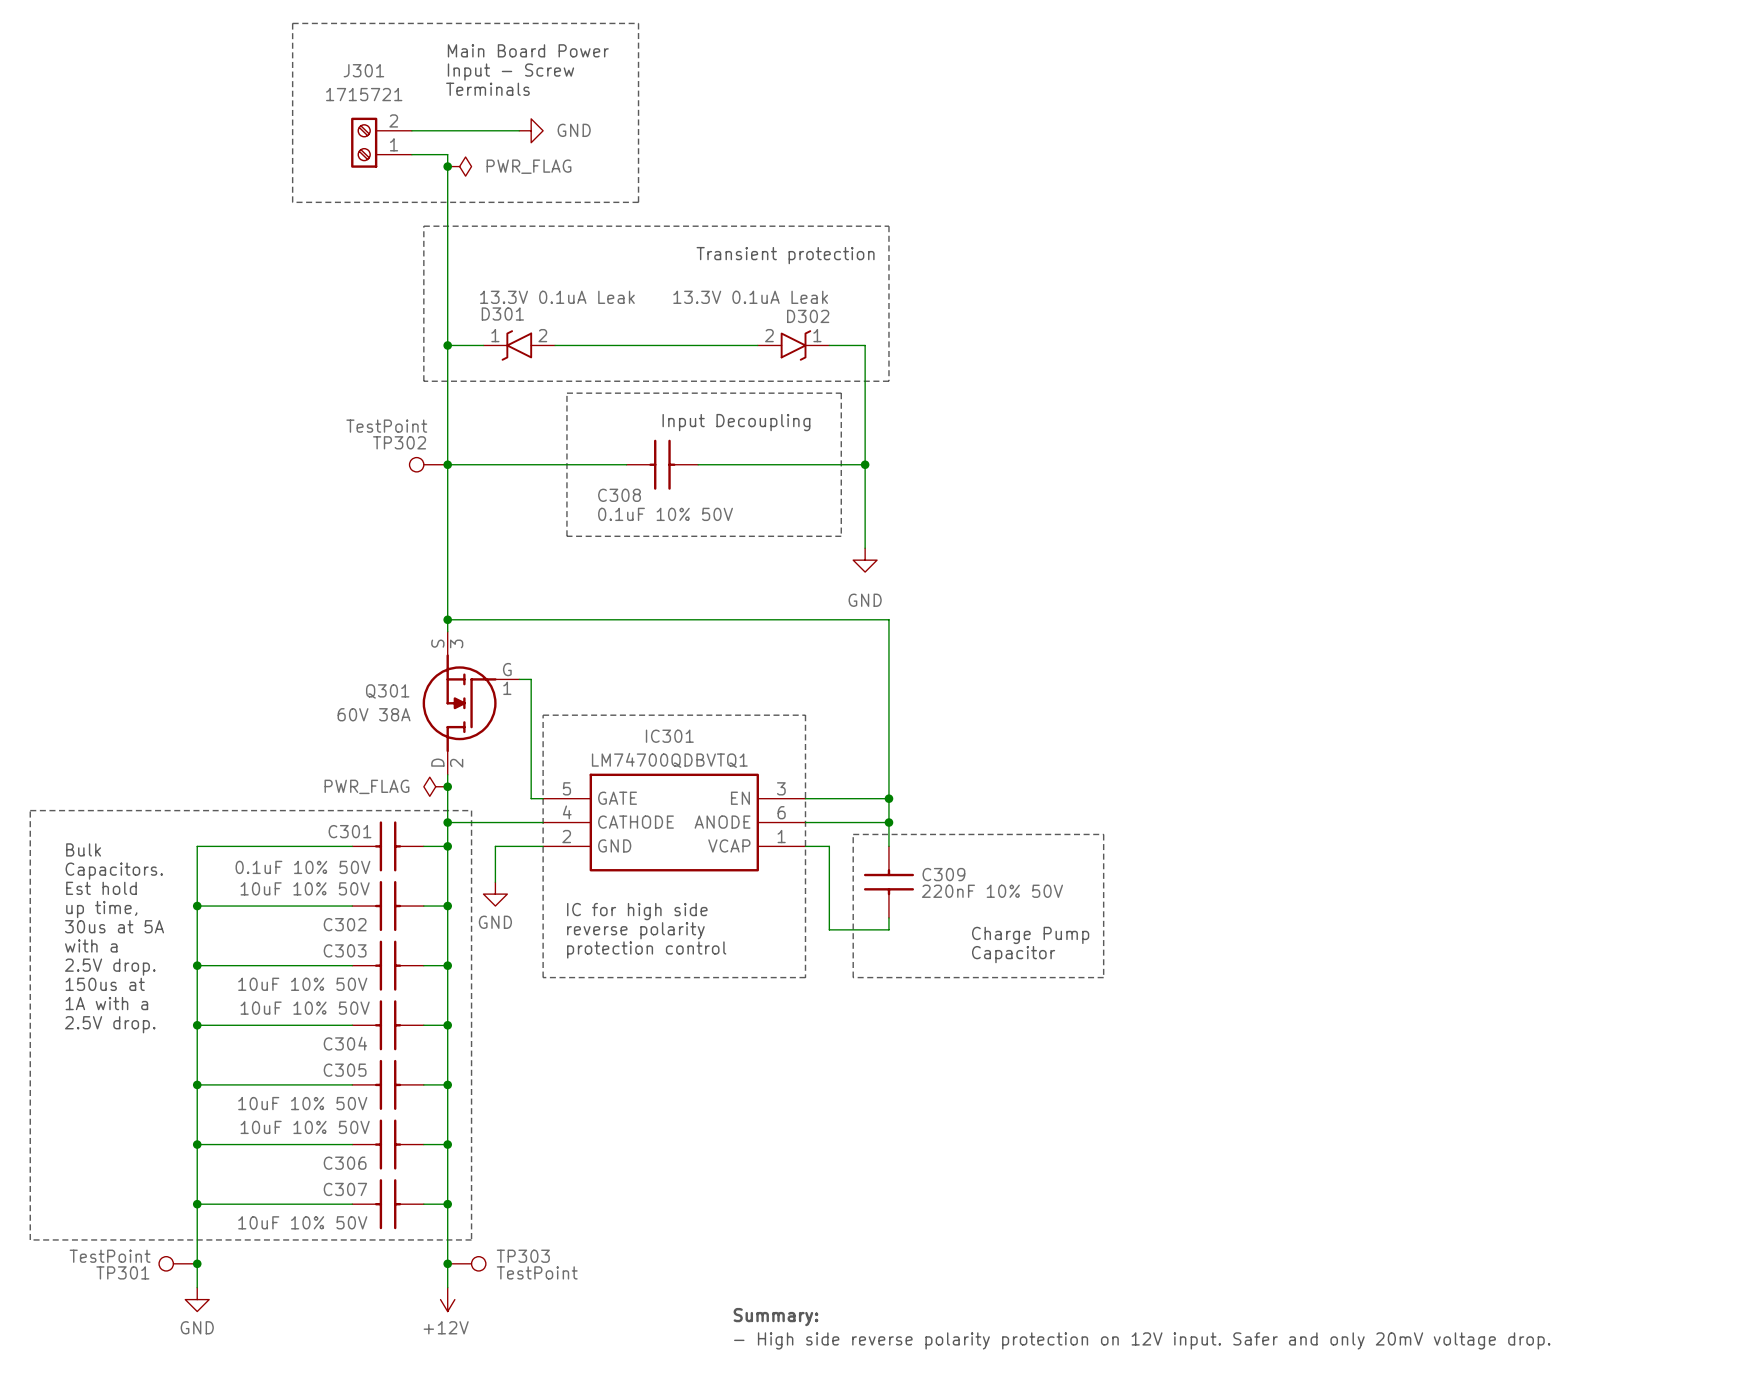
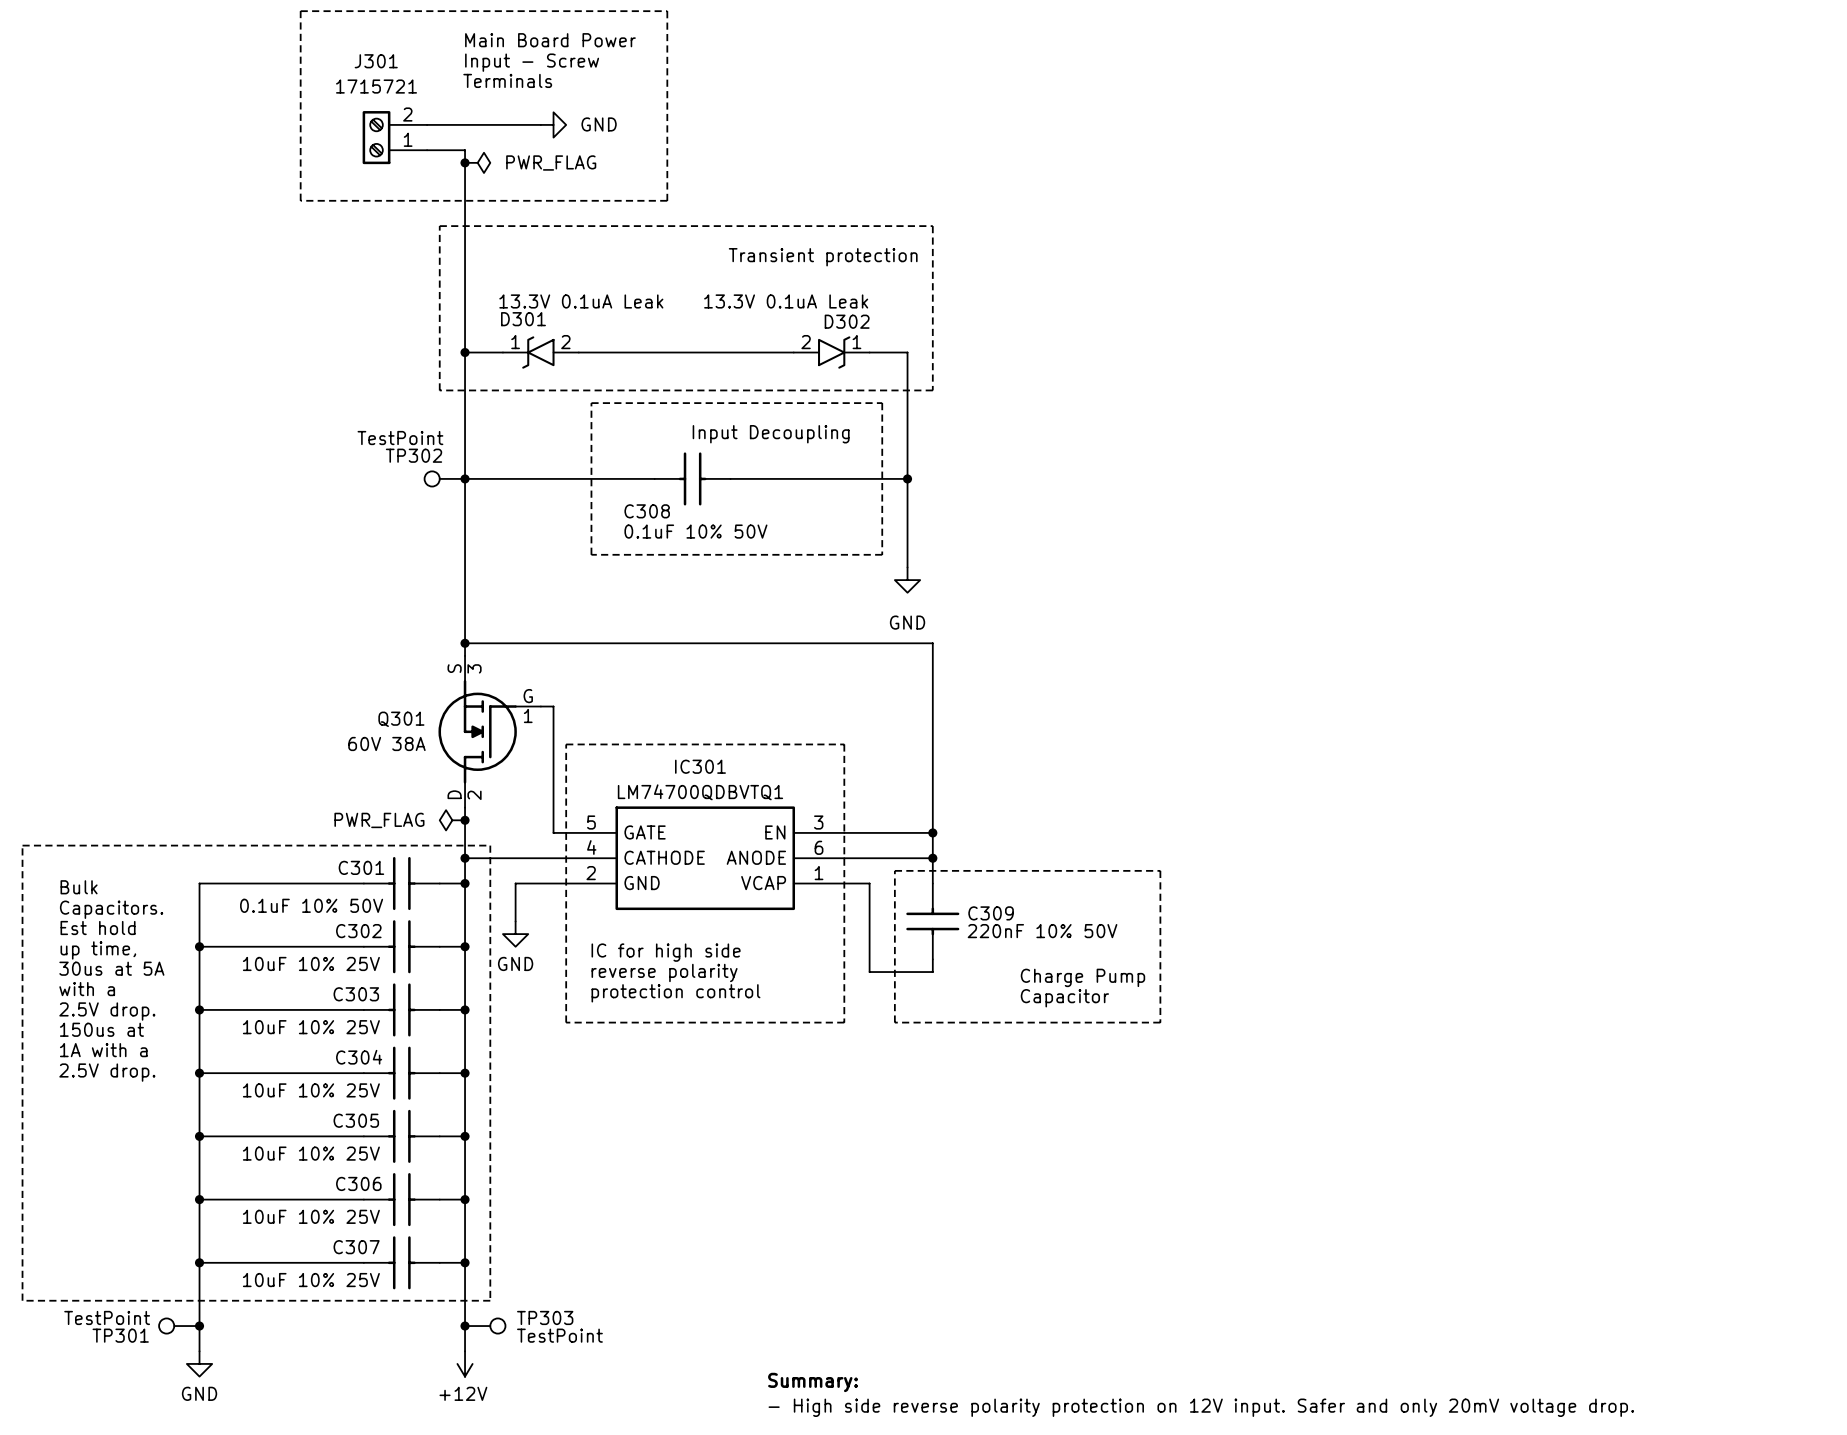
C302 value: 10uF 10% 50V (305, 888) -> 10uF 10% 25V (311, 963)
C302 name position: C302 (345, 924) -> C302 (358, 931)
C303 value: 10uF 10% 50V (302, 984) -> 10uF 10% 25V (311, 1027)
C304 value: 10uF 10% 50V (305, 1008) -> 10uF 10% 25V (311, 1090)
C304 name position: C304 (345, 1043) -> C304 (359, 1057)
C305 value: 10uF 10% 50V (302, 1103) -> 10uF 10% 25V (311, 1153)
C306 value: 10uF 10% 50V (305, 1127) -> 10uF 10% 25V (311, 1216)
C306 name position: C306 (345, 1163) -> C306 (358, 1183)
C307 value: 10uF 10% 50V (302, 1222) -> 10uF 10% 25V (311, 1280)

